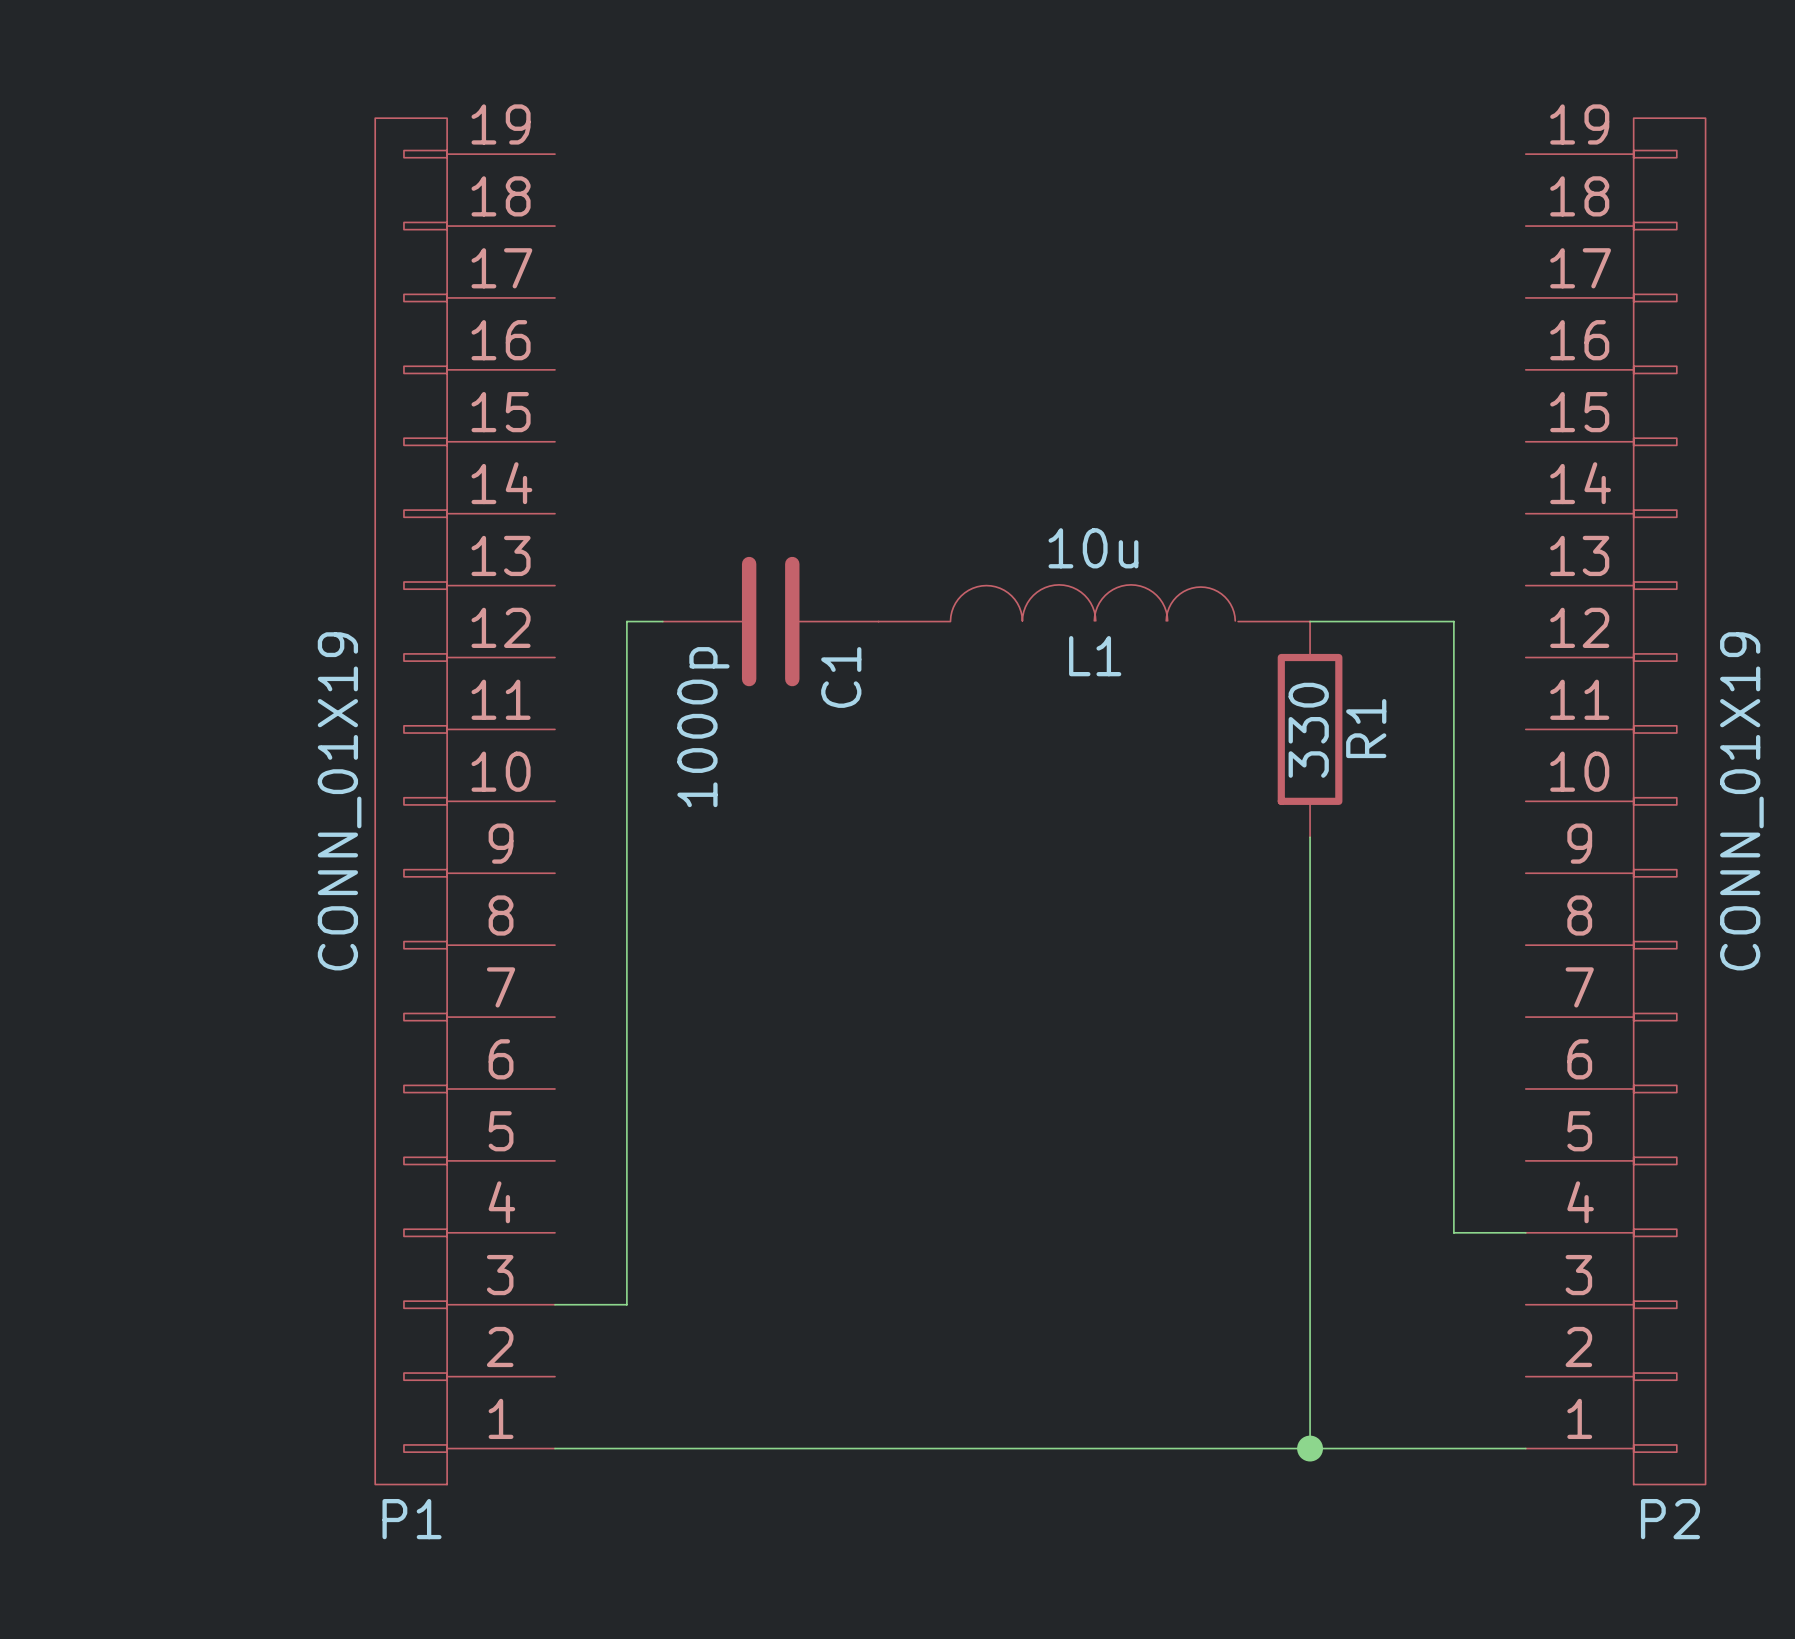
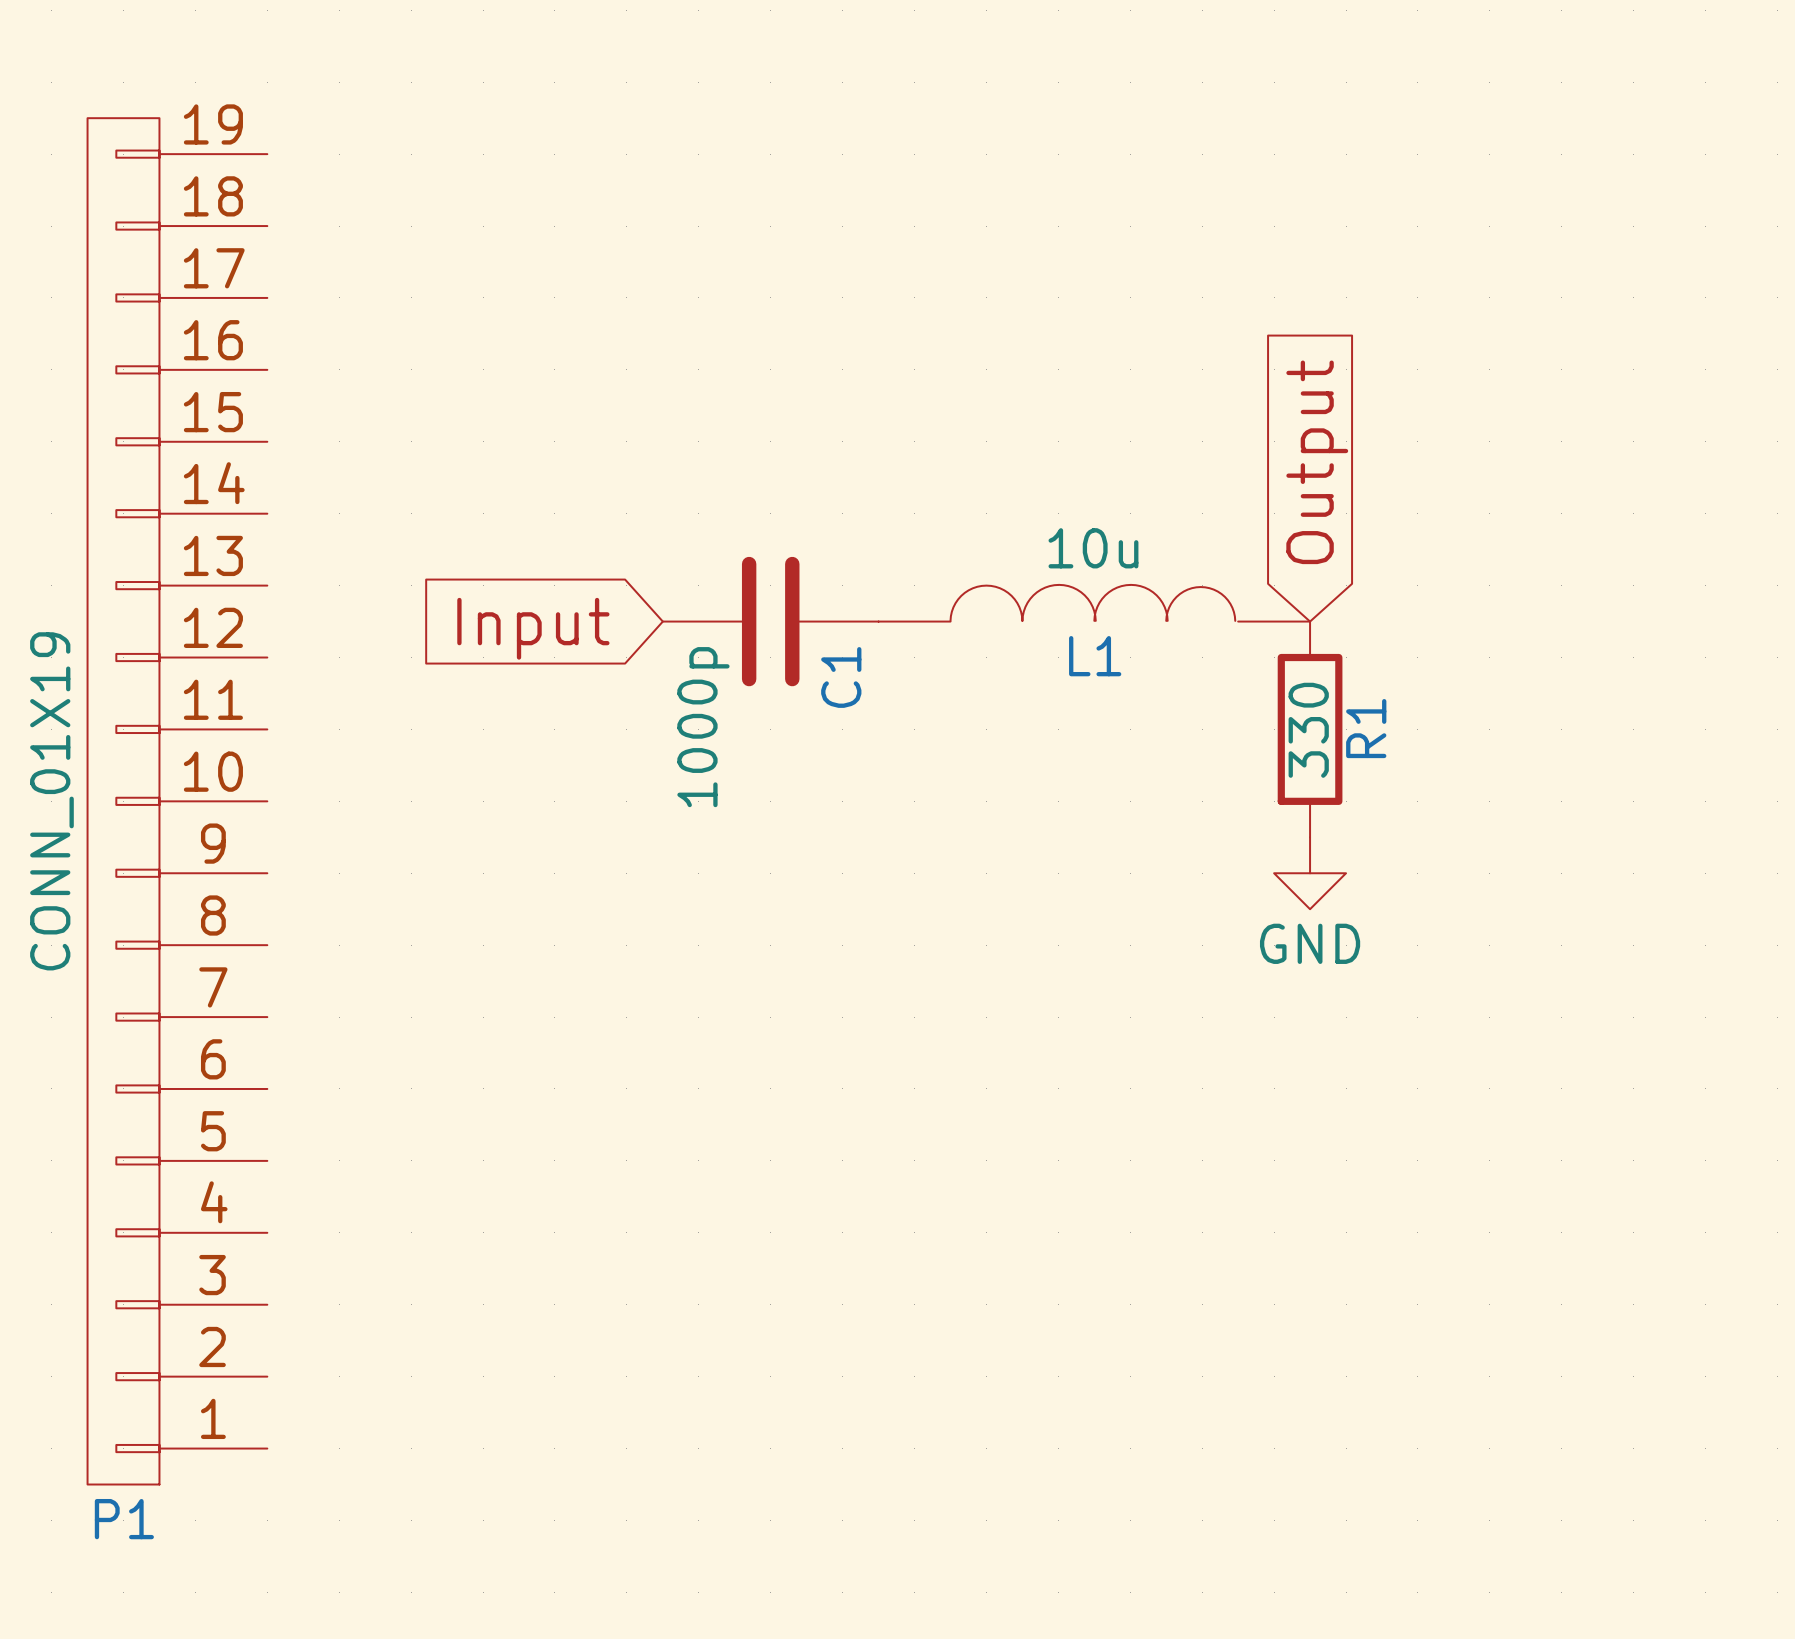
global label: none -> Output (1317, 462)
wire: (662, 621) (626, 621) (626, 1304) (554, 1304) -> none
wire: (1310, 621) (1453, 621) (1453, 1232) (1525, 1232) -> none
global label: none -> Input (533, 628)
P1 position: (465, 801) -> (177, 801)
P2: CONN_01X19 (1615, 801) -> none
wire: (1310, 837) (1310, 1448) -> none
power symbol: none -> GND (1310, 873)
wire: (554, 1448) (1525, 1448) -> none
junction: (1310, 1448) -> none

